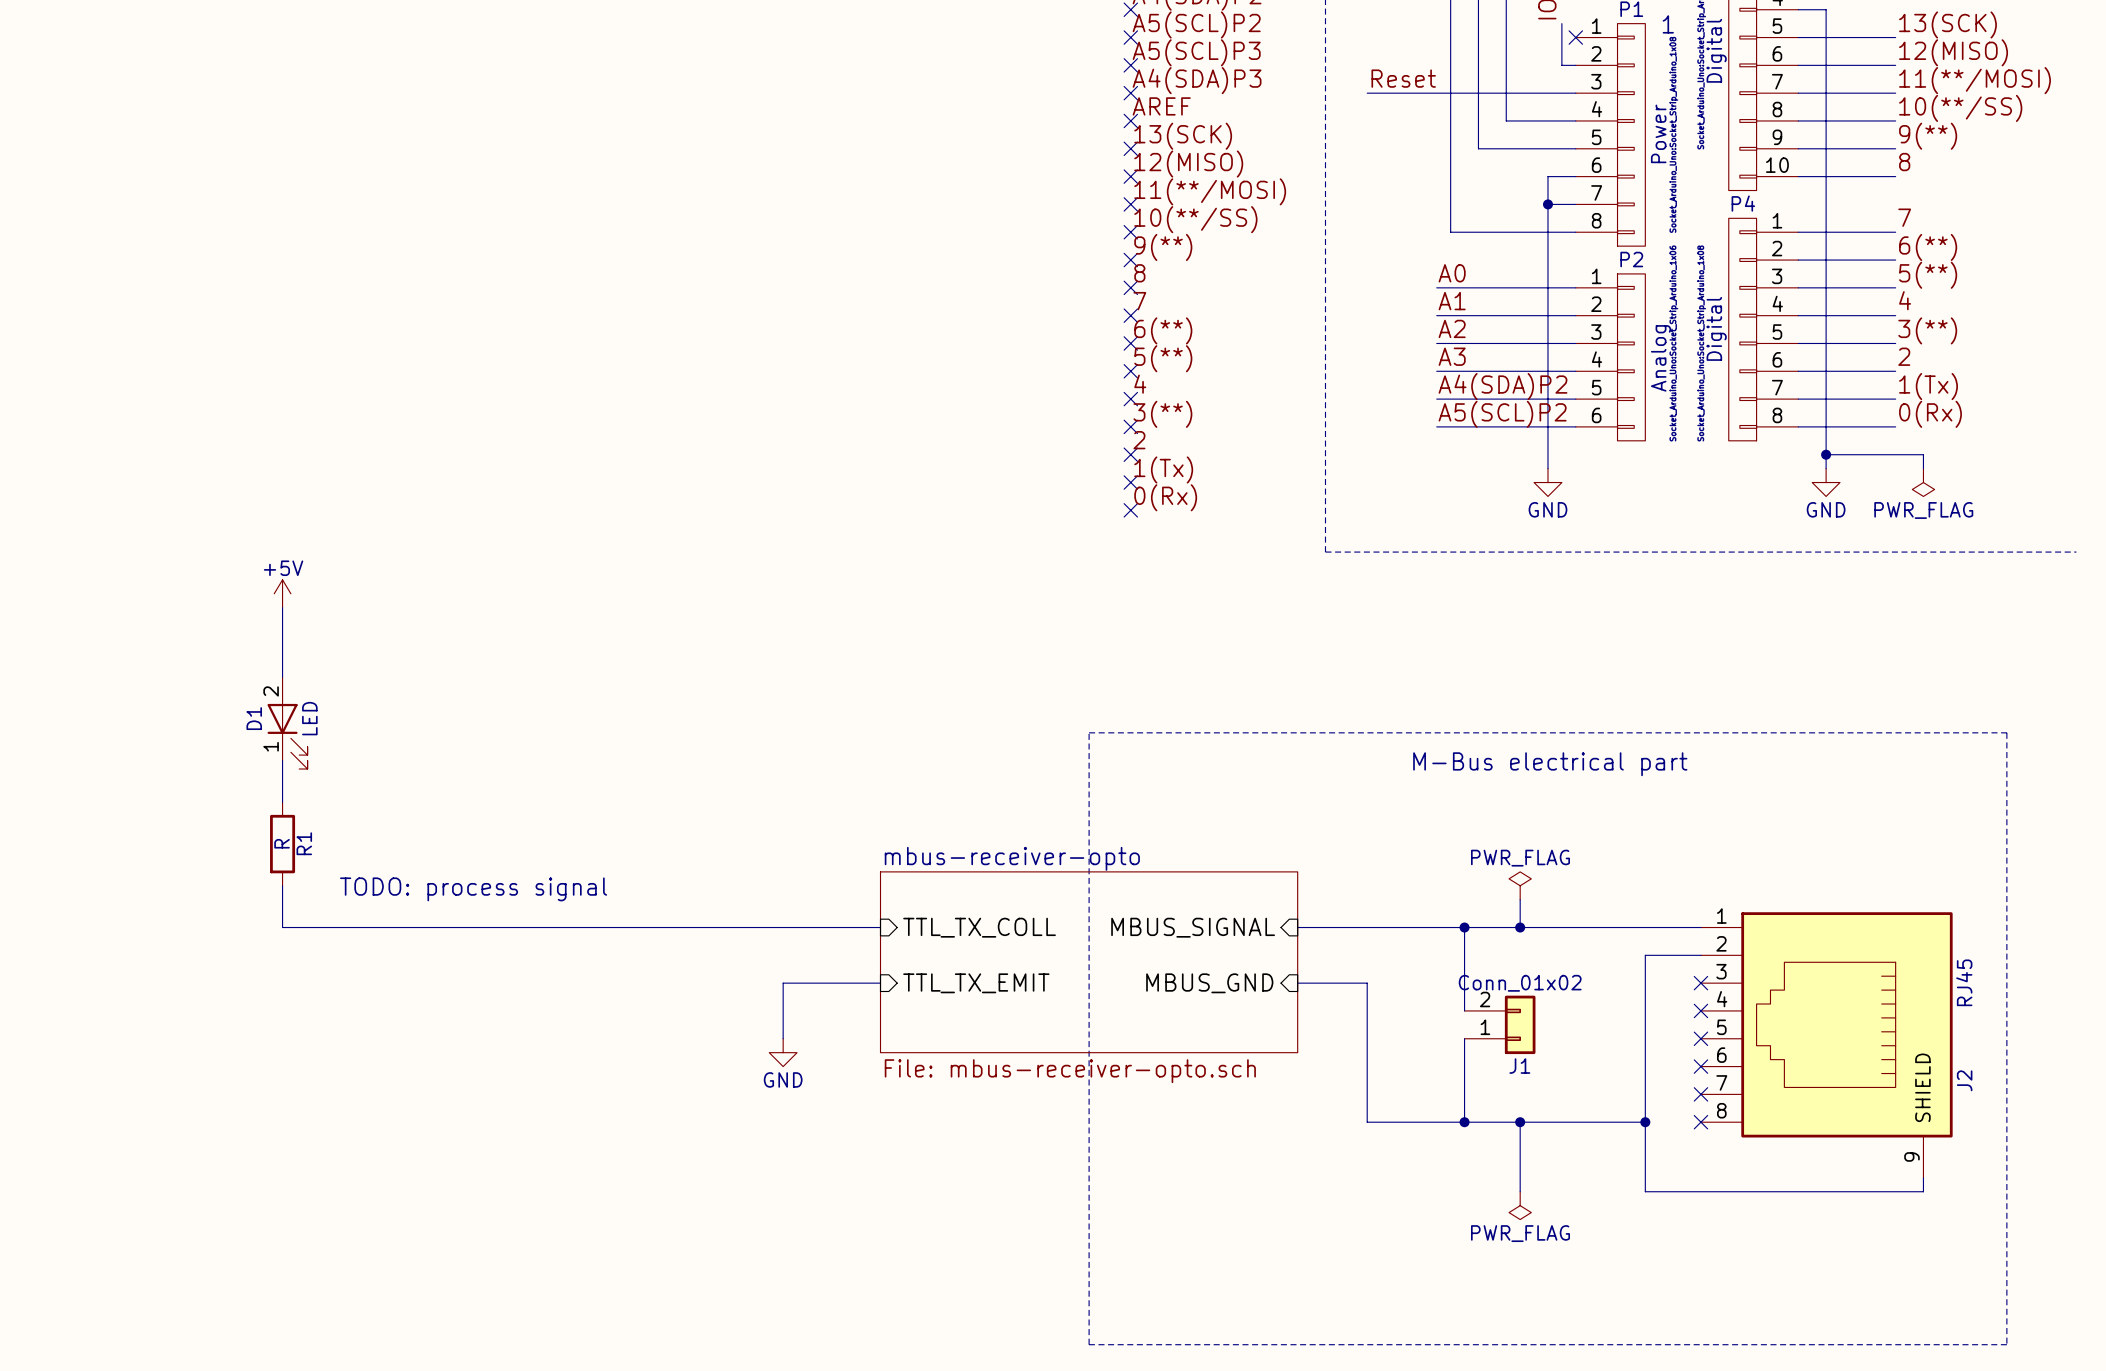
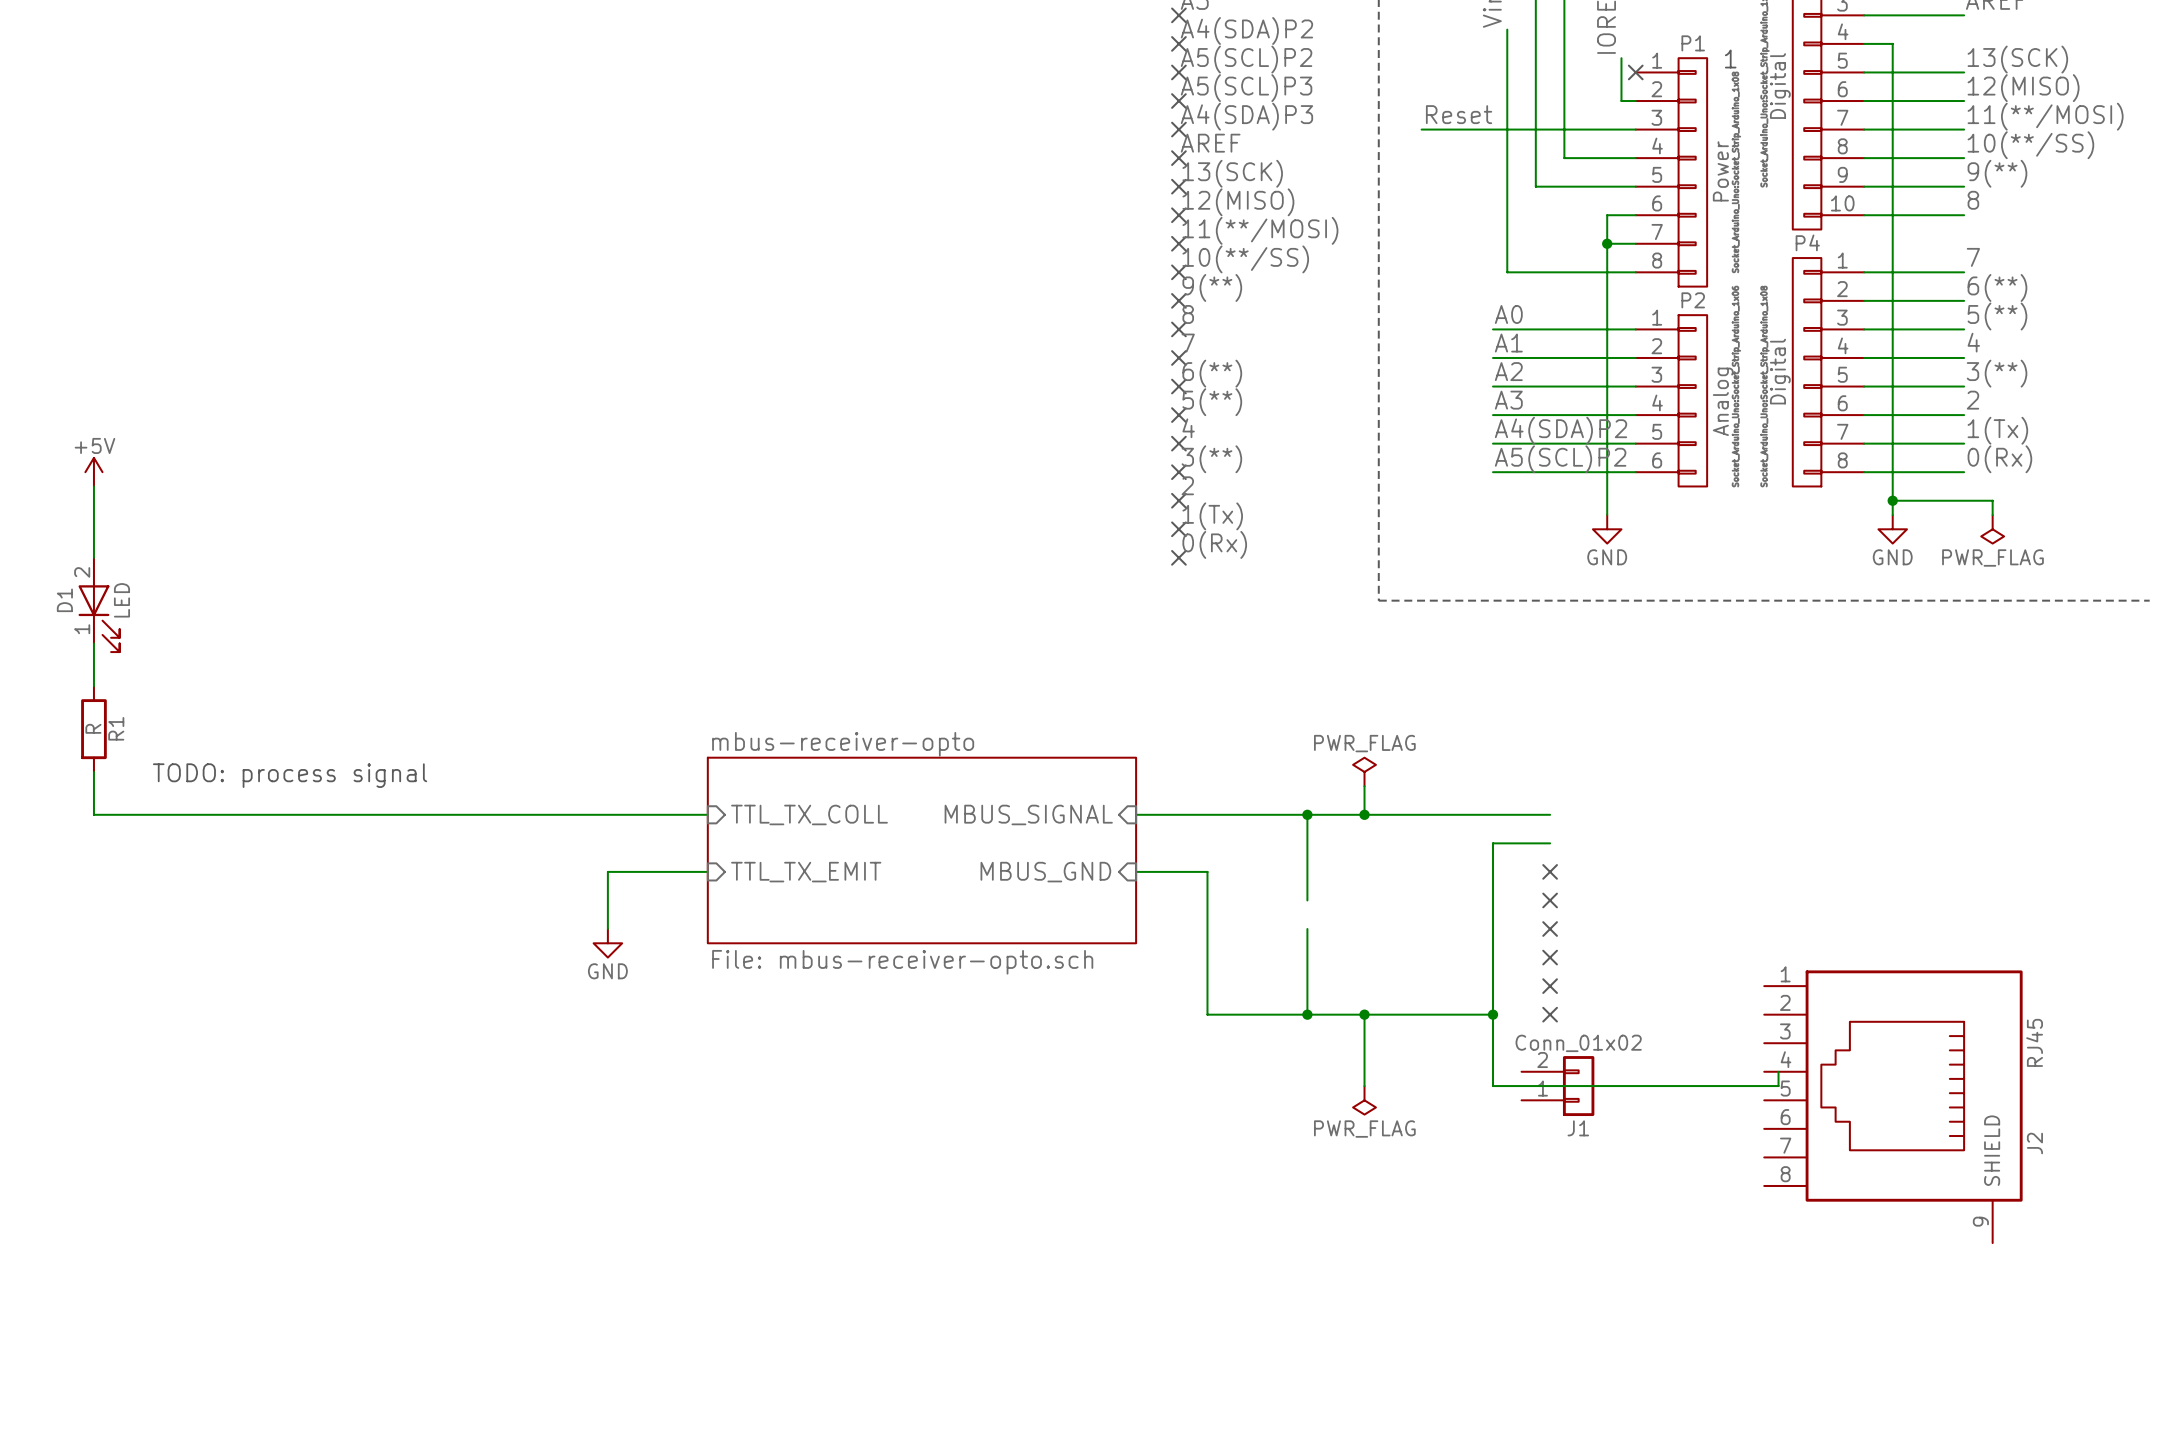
power symbol position: +5V (282, 593) -> +5V (93, 472)
wire: (282, 607) (282, 677) -> (93, 486) (93, 557)
power symbol: none -> PWR_FLAG (1364, 771)
D1 position: (287, 723) -> (99, 604)
line: (1089, 732) (2006, 732) (2006, 1344) (1089, 1344) (1089, 732) -> none
wire: (282, 760) (282, 802) -> (93, 643) (93, 686)
junction: none -> (1307, 814)
junction: none -> (1364, 814)
text: M-Bus electrical part (1550, 764) -> none
no-connect mark: none -> (1550, 871)
R1 position: (282, 844) -> (93, 729)
no-connect mark: none -> (1550, 900)
no-connect mark: none -> (1550, 929)
wire: (282, 885) (282, 927) (880, 927) -> (93, 771) (93, 814) (707, 814)
power symbol: PWR_FLAG (1520, 885) -> none
text position: TODO: process signal (473, 889) -> TODO: process signal (290, 775)
no-connect mark: none -> (1550, 957)
wire: (1520, 899) (1520, 927) -> (1364, 786) (1364, 814)
sheet pin position: TTL_TX_COLL (979, 927) -> TTL_TX_COLL (809, 814)
sheet pin position: MBUS_SIGNAL (1193, 927) -> MBUS_SIGNAL (1028, 814)
wire: (1297, 927) (1700, 927) -> (1136, 814) (1550, 814)
wire: (1464, 927) (1464, 1010) -> (1307, 814) (1307, 900)
junction position: (1464, 927) -> (1492, 1014)
no-connect mark: none -> (1550, 986)
junction: (1520, 927) -> none
junction: none -> (1307, 1014)
junction: none -> (1364, 1014)
no-connect mark: none -> (1550, 1014)
wire: (1700, 955) (1645, 955) (1645, 1191) (1923, 1191) (1923, 1177) -> (1550, 843) (1492, 843) (1492, 1086) (1778, 1086) (1778, 1071)
sheet mbus-receiver-opto position: (1089, 962) -> (921, 850)
wire: (880, 983) (783, 983) (783, 1038) -> (707, 871) (607, 871) (607, 929)
sheet pin position: TTL_TX_EMIT (976, 983) -> TTL_TX_EMIT (806, 872)
sheet pin position: MBUS_GND (1209, 983) -> MBUS_GND (1045, 872)
wire: (1297, 983) (1367, 983) (1367, 1122) (1645, 1122) -> (1136, 871) (1207, 871) (1207, 1014) (1492, 1014)
no-connect mark: (1700, 983) -> none
no-connect mark: (1700, 1010) -> none
power symbol: none -> PWR_FLAG (1364, 1100)
wire: (1464, 1038) (1464, 1122) -> (1307, 929) (1307, 1014)
no-connect mark: (1700, 1038) -> none
power symbol position: GND (783, 1052) -> GND (607, 943)
no-connect mark: (1700, 1066) -> none
no-connect mark: (1700, 1094) -> none
junction: (1464, 1122) -> none
wire: (1520, 1122) (1520, 1191) -> (1364, 1014) (1364, 1086)
junction: (1520, 1122) -> none
junction: (1645, 1122) -> none
no-connect mark: (1700, 1122) -> none
power symbol: PWR_FLAG (1520, 1205) -> none

